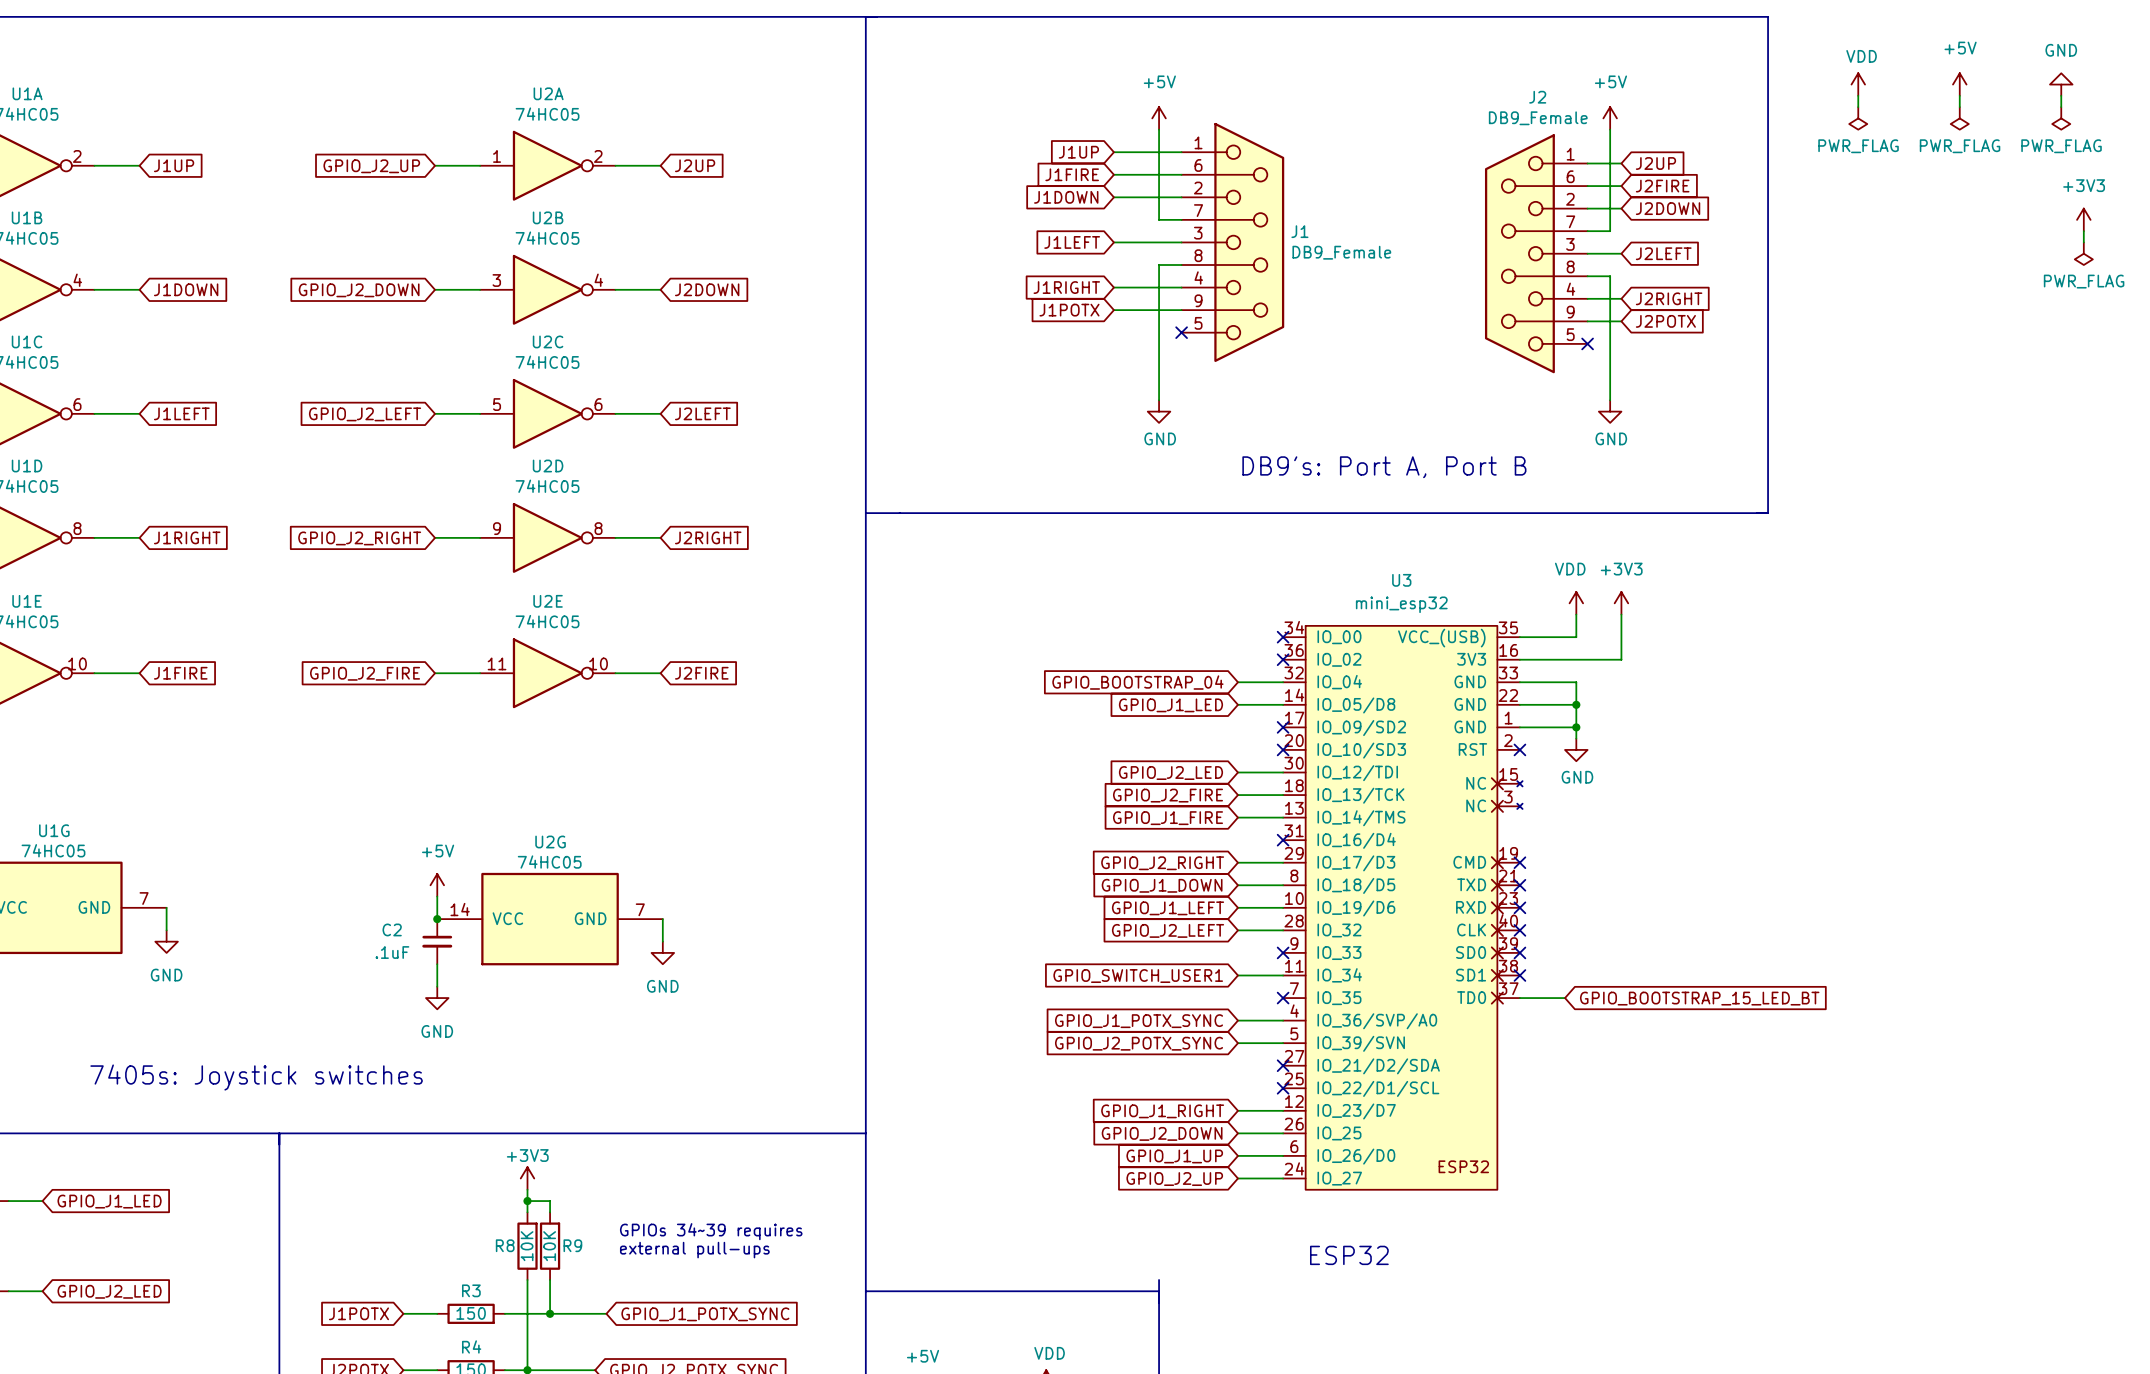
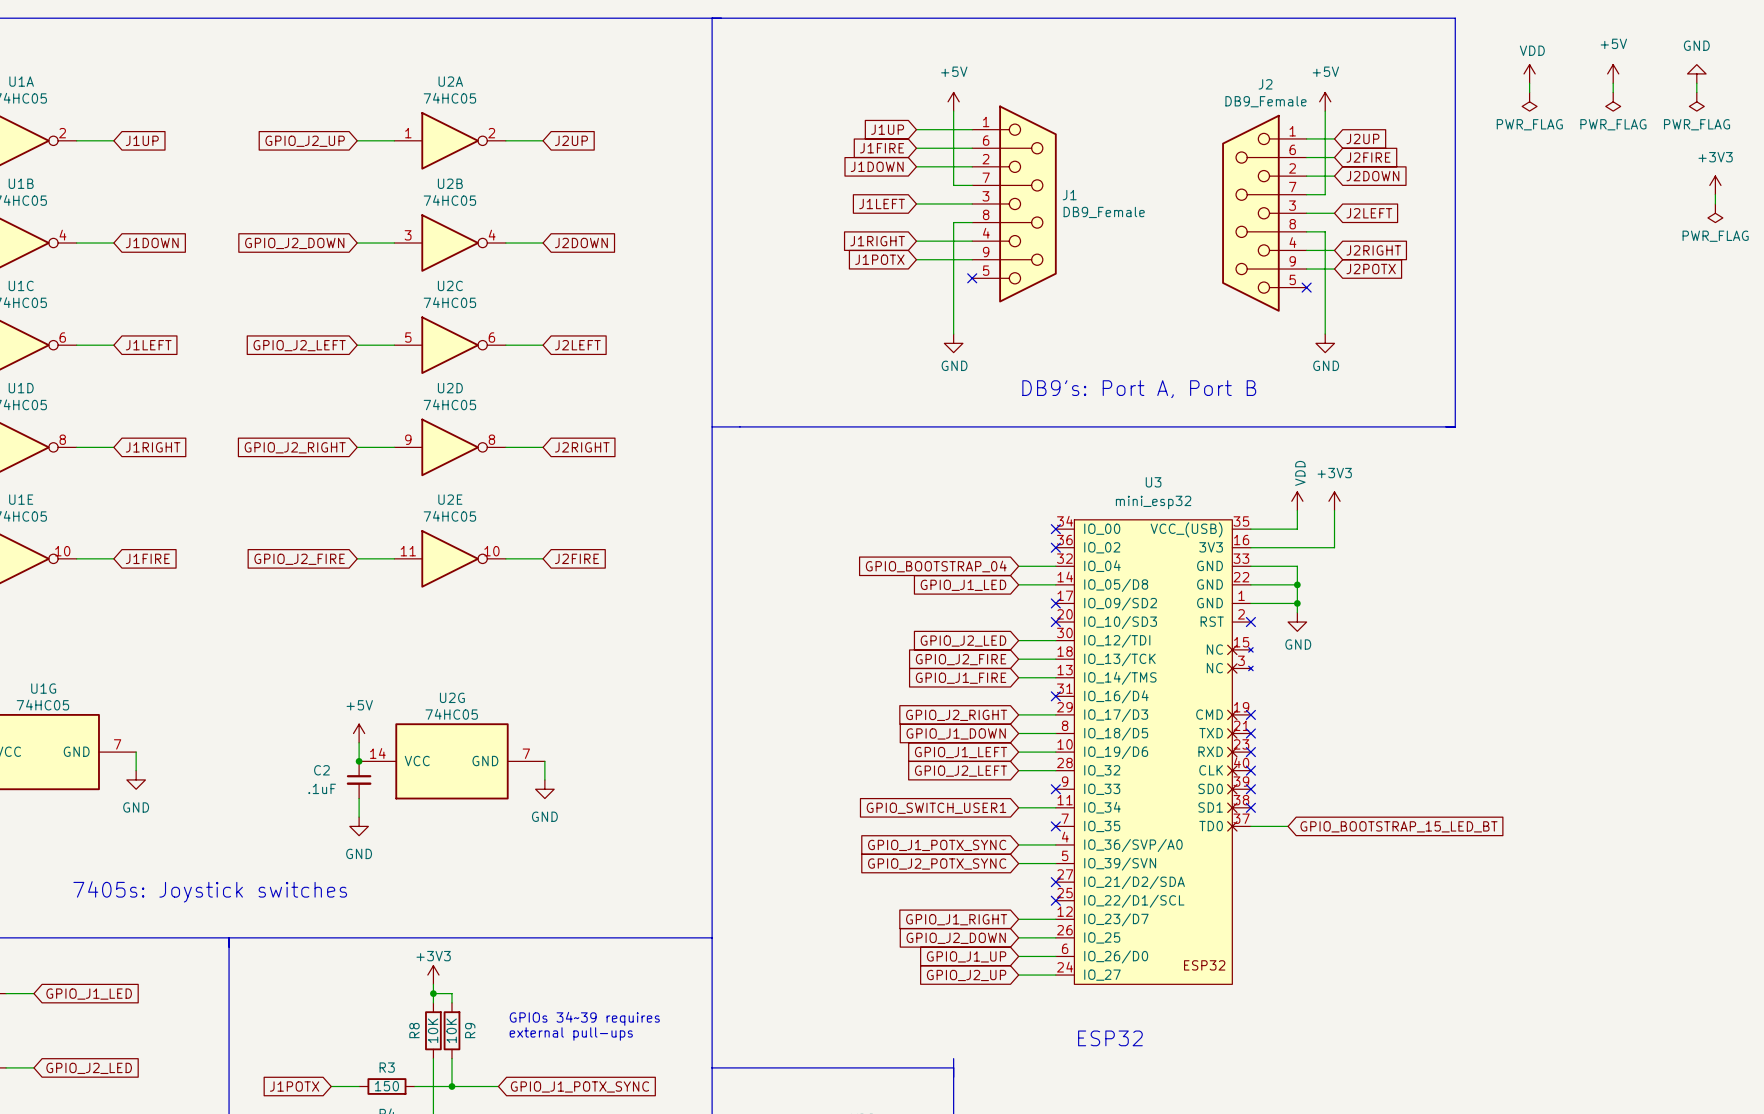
power symbol text rotation: 0° (1570, 569) -> 90° counterclockwise (1300, 473)
R8 name rotation: 0° (505, 1245) -> 90° counterclockwise (414, 1030)
R9 name rotation: 0° (572, 1245) -> 90° counterclockwise (470, 1030)

